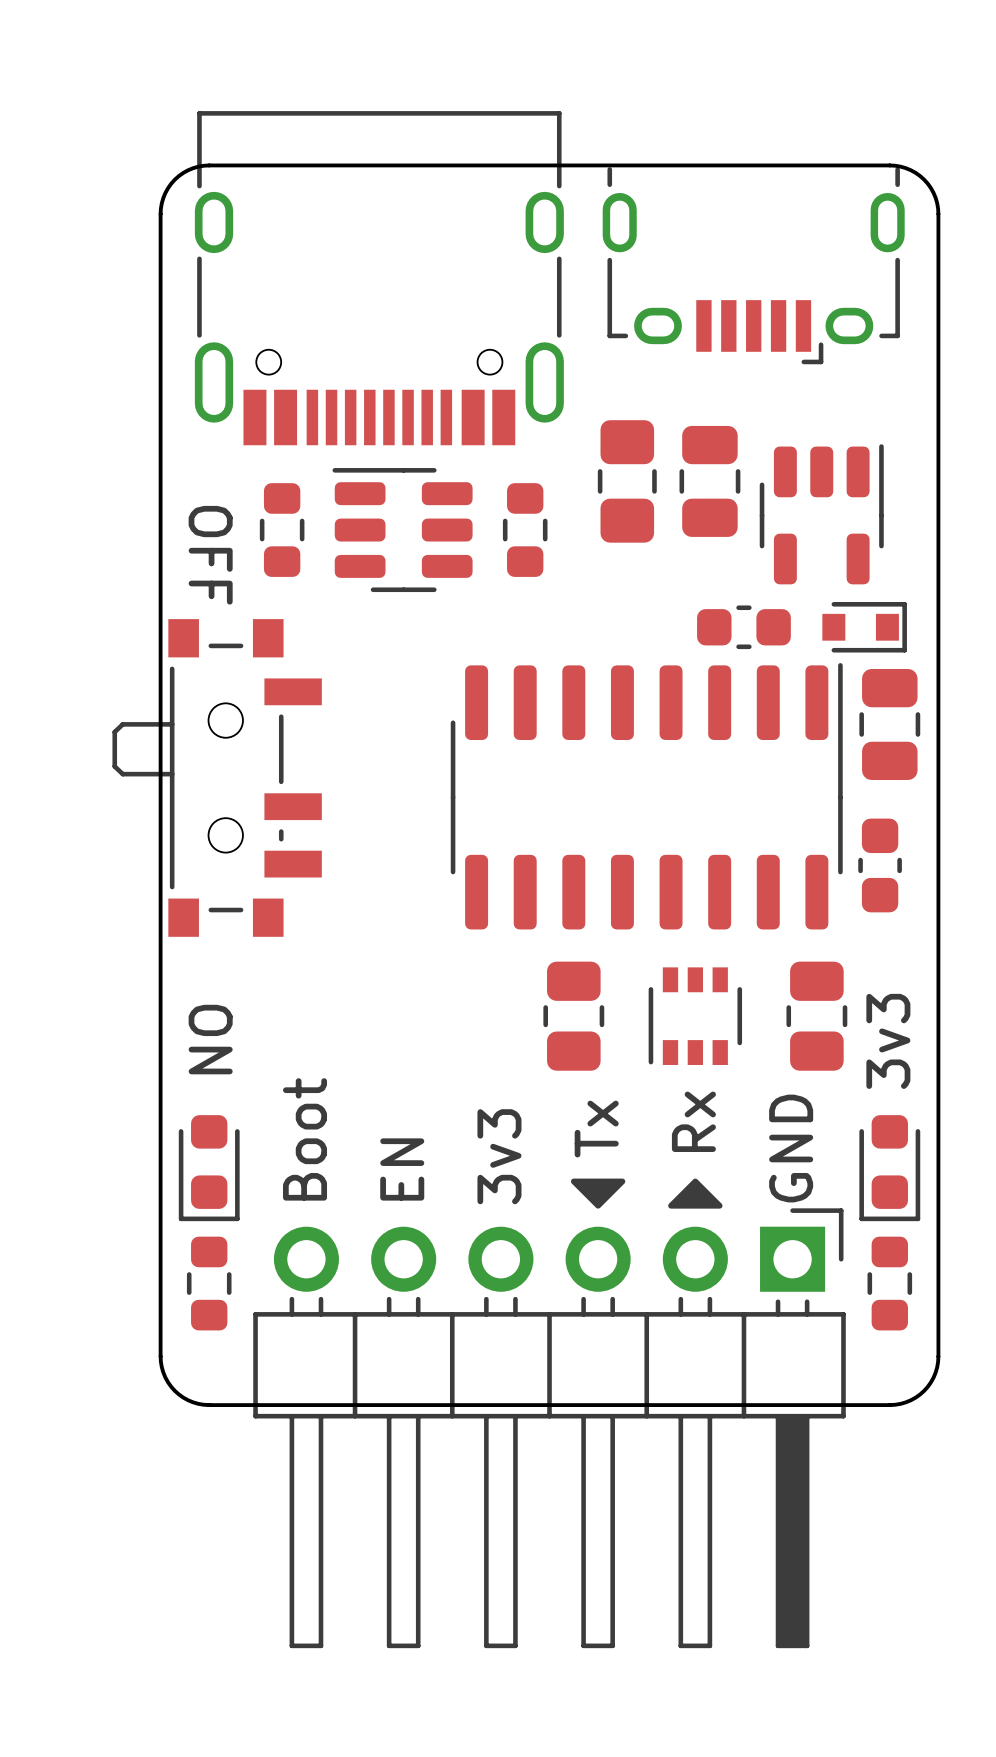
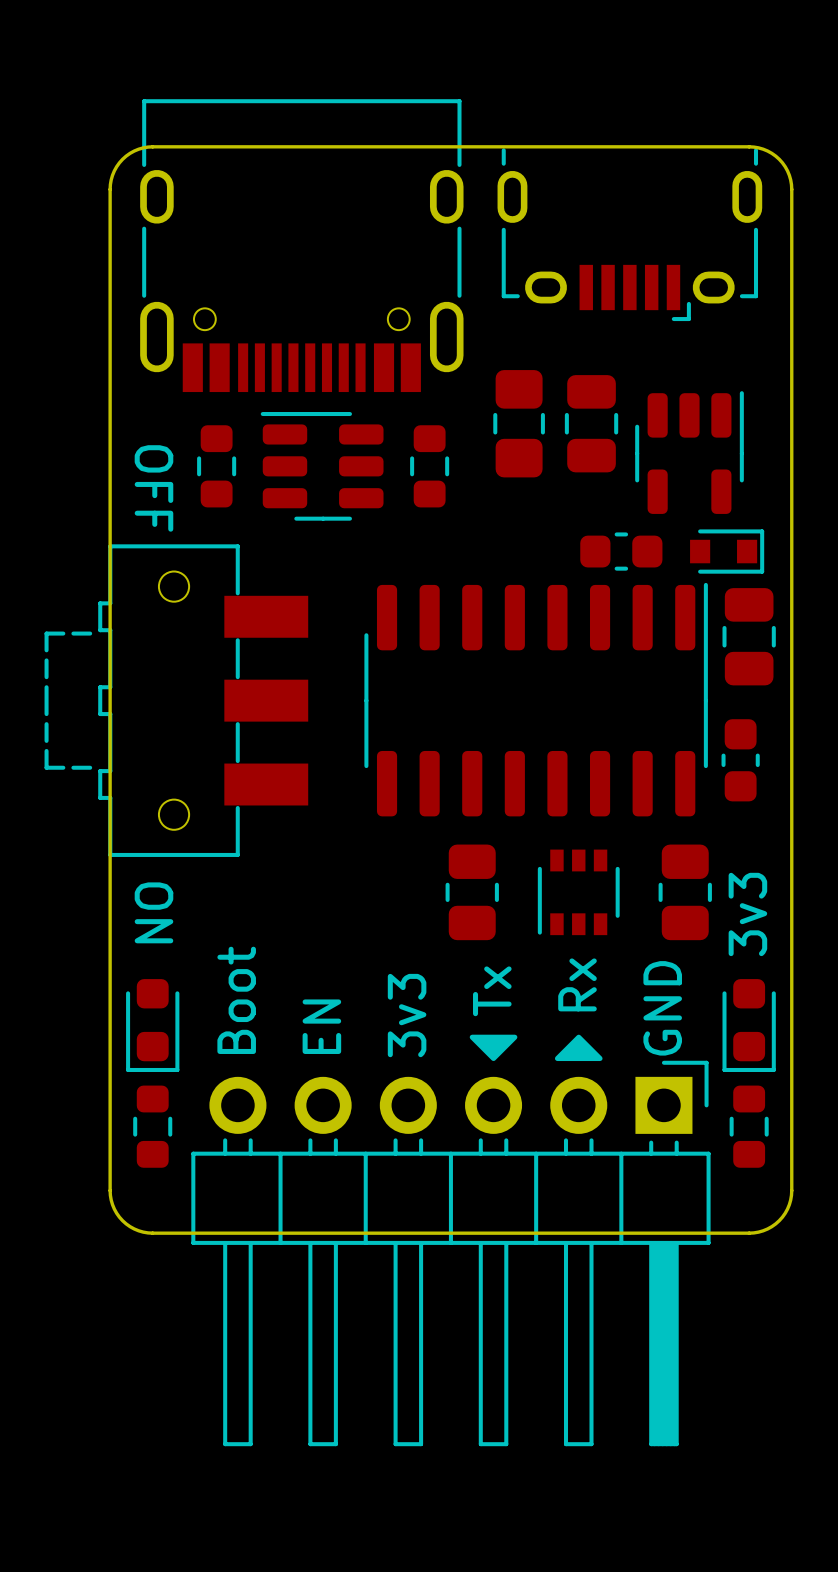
part footprint: [112, 619, 322, 937] -> [44, 544, 309, 857]

